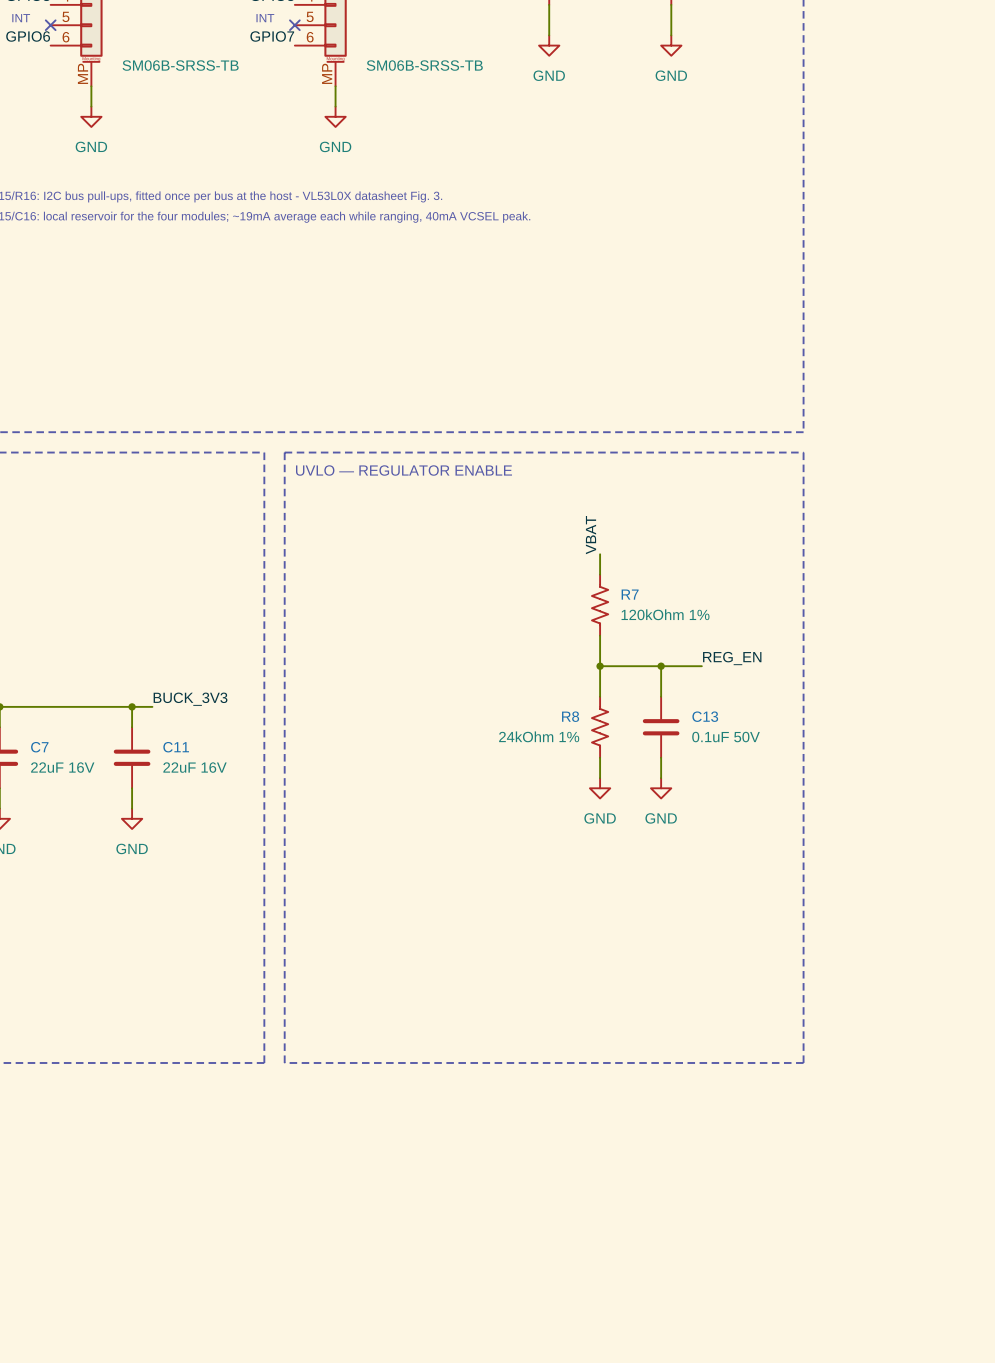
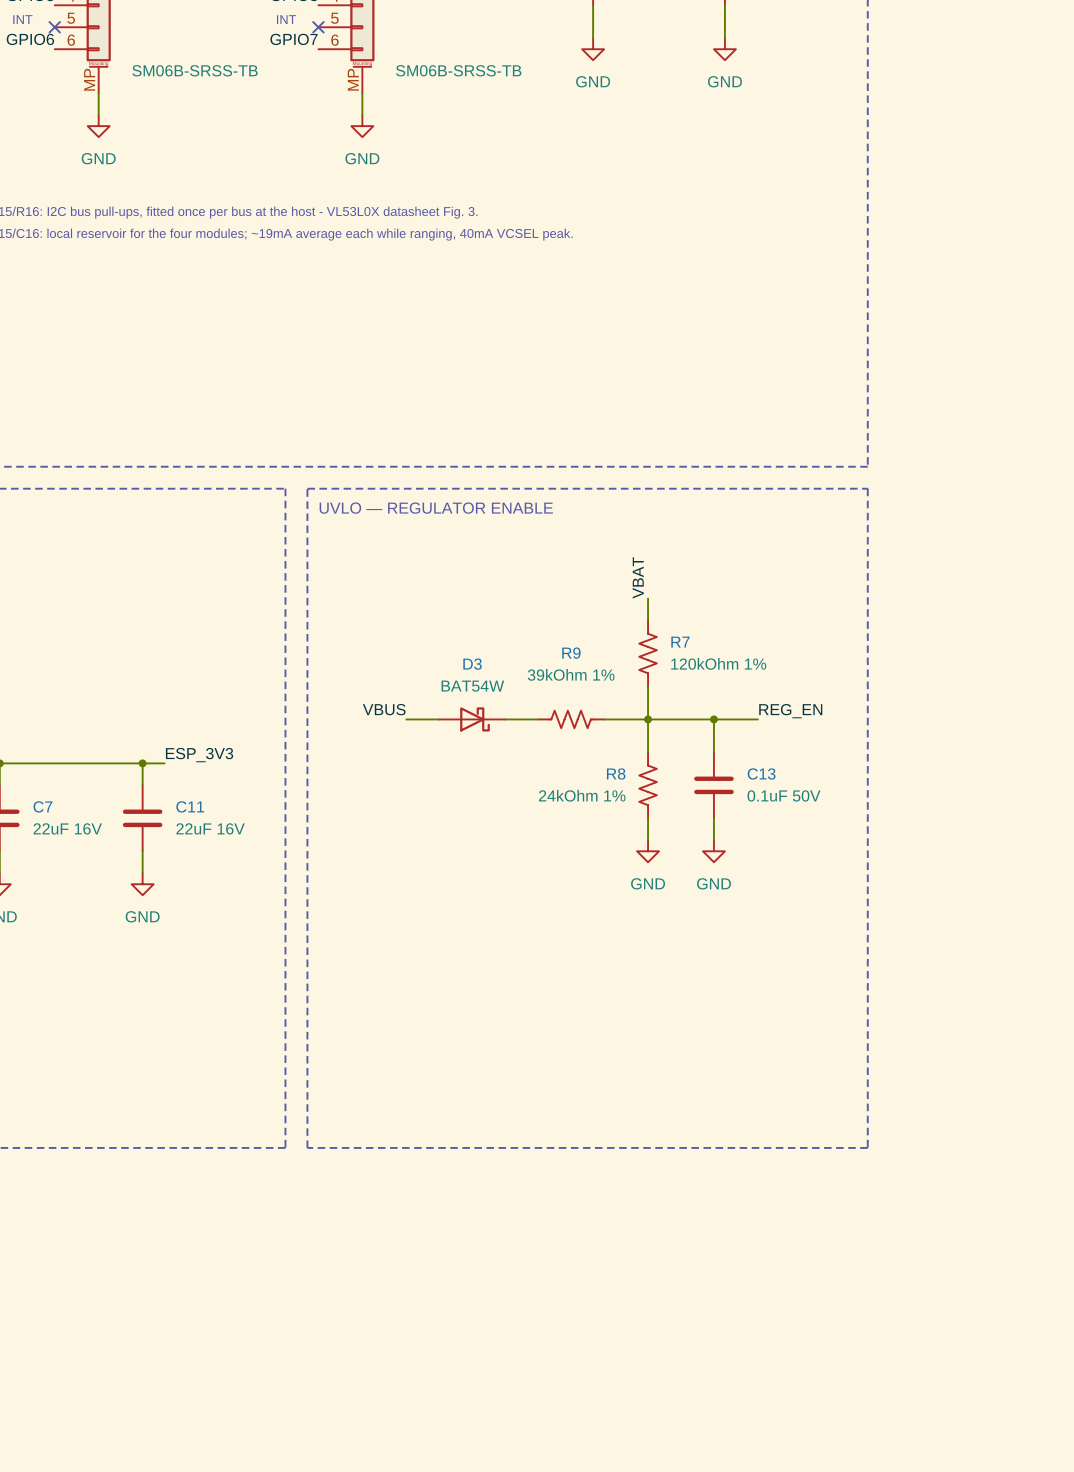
label: none -> VBUS (384, 709)
wire: none -> (406, 719) (439, 719)
D3: none -> BAT54W (472, 719)
wire: none -> (505, 719) (538, 719)
R9: none -> 39kOhm 1% (571, 719)
wire: none -> (604, 719) (648, 719)
label: BUCK_3V3 (190, 699) -> ESP_3V3 (199, 755)

